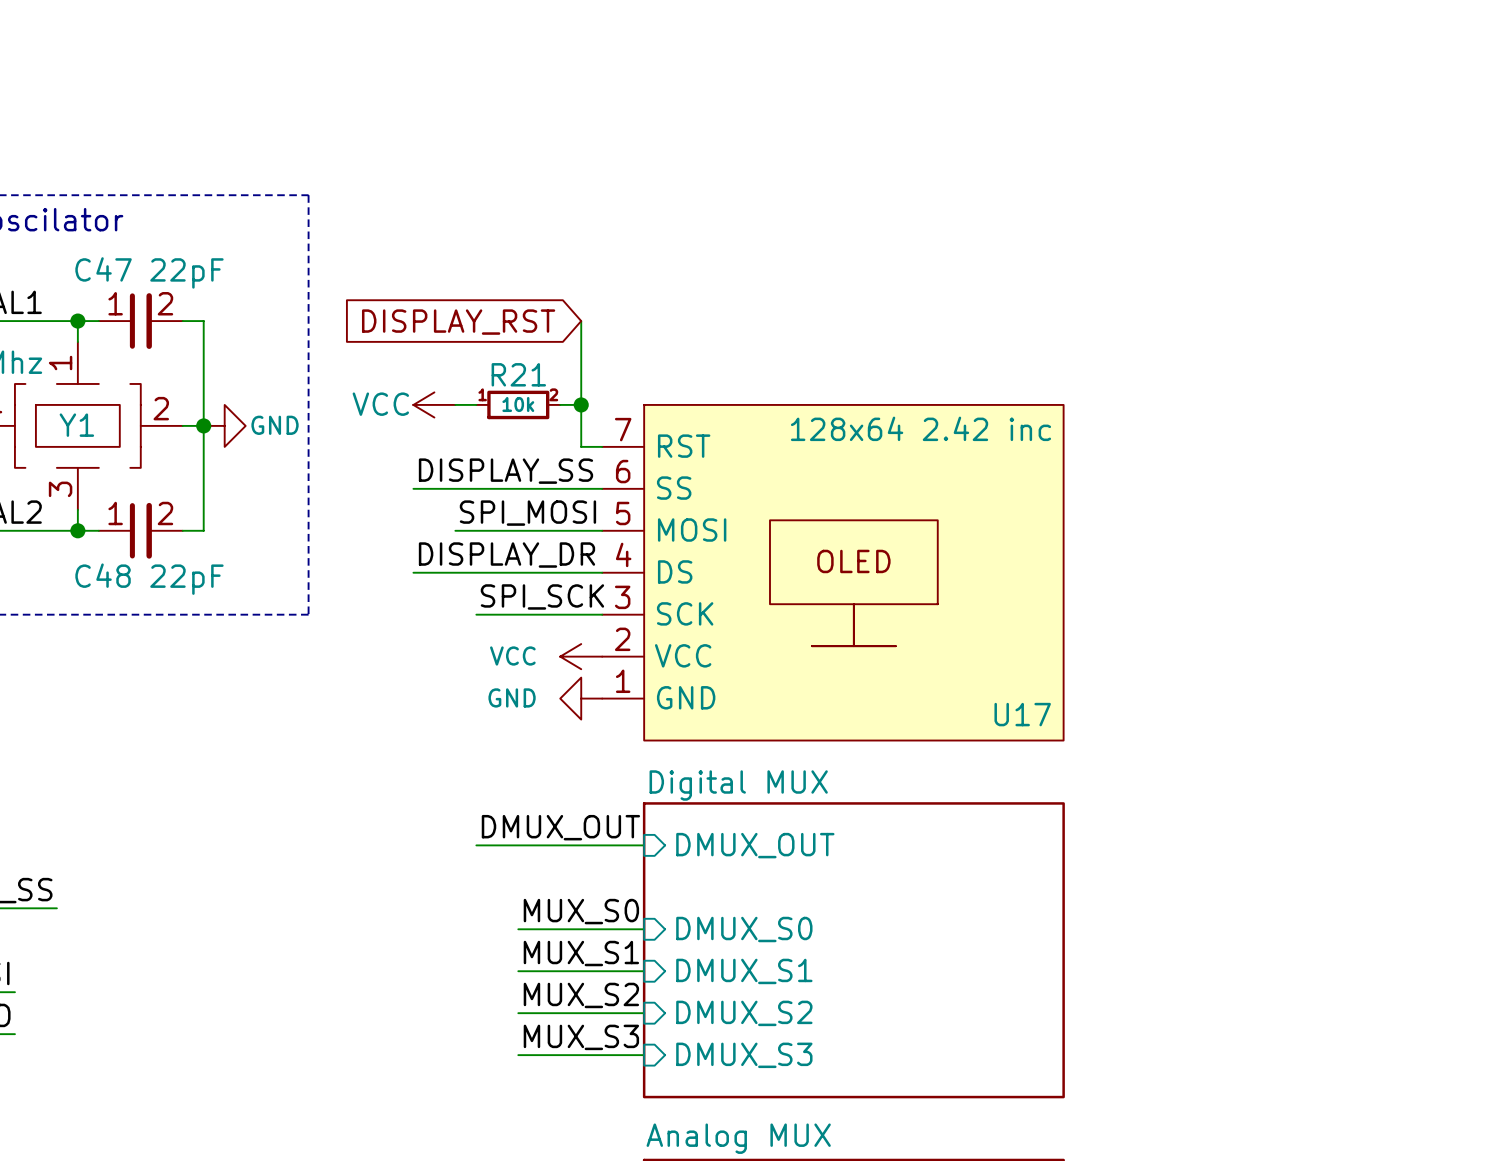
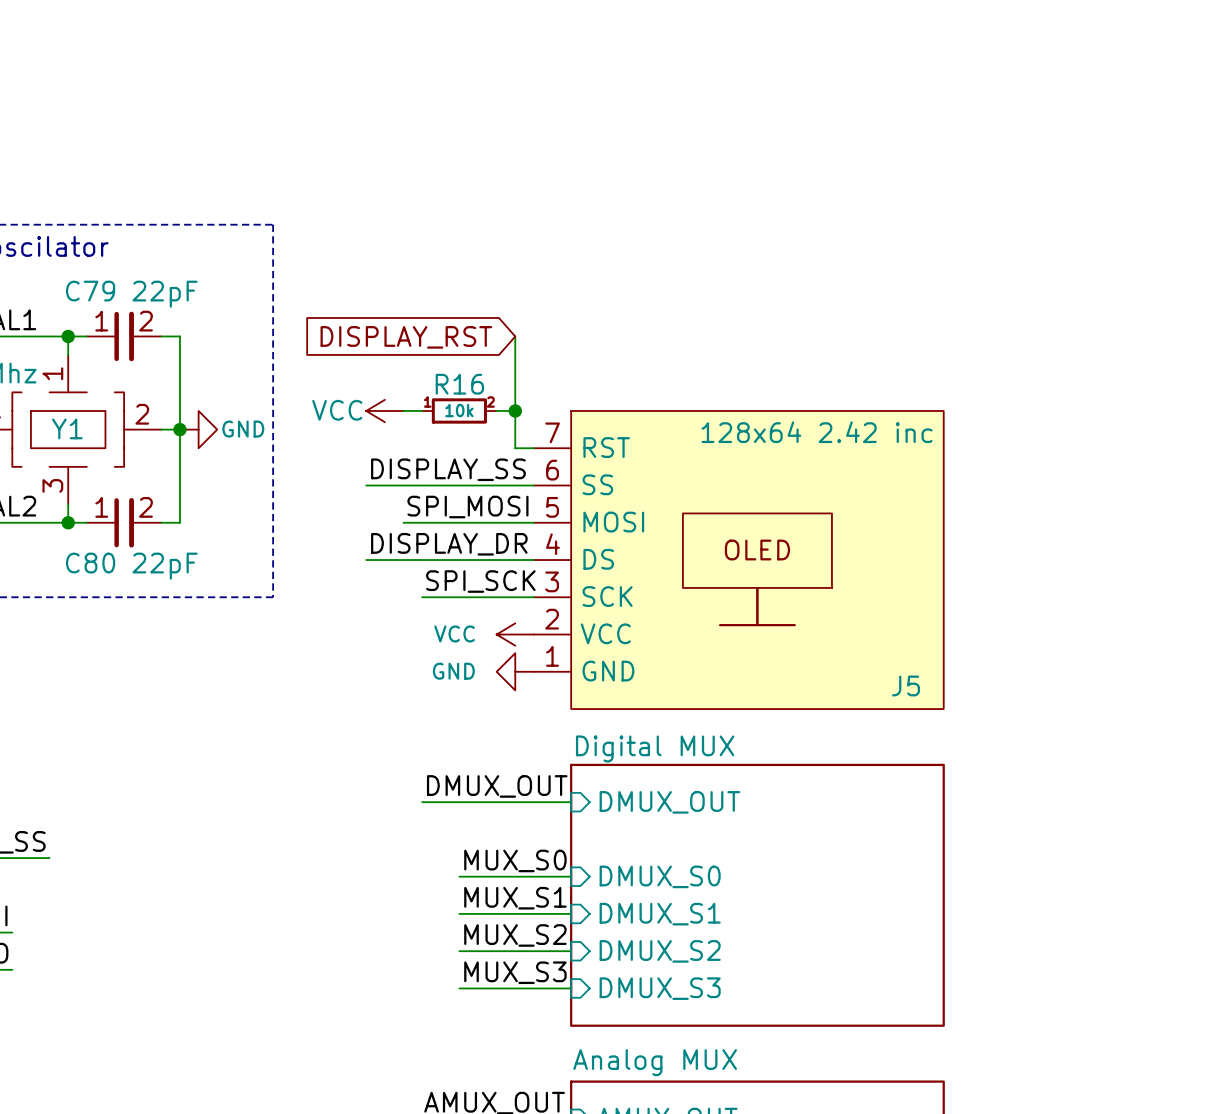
C47 name: C47 (103, 269) -> C79 (90, 291)
R21 name: R21 (518, 374) -> R16 (459, 384)
C48 name: C48 (103, 575) -> C80 (90, 563)
U17 name: U17 (1022, 714) -> J5 (906, 685)

